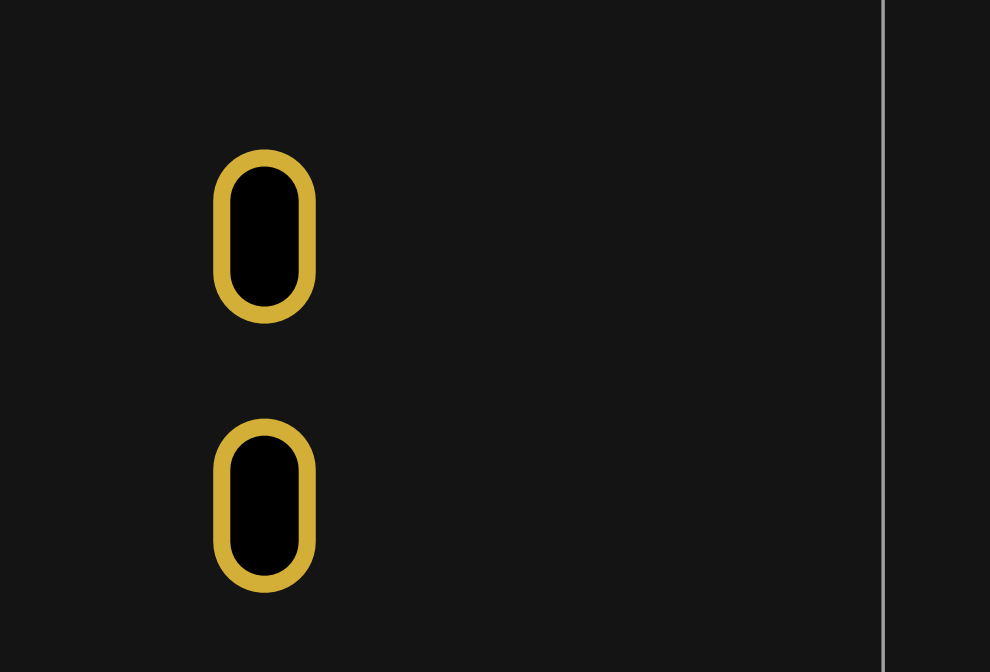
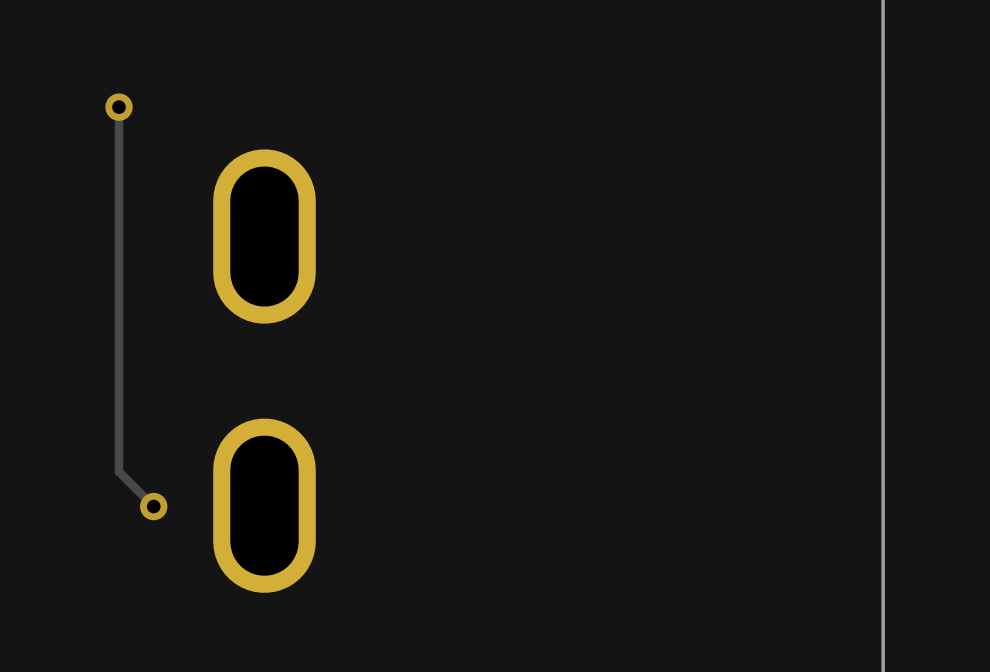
track: none -> (119, 107) (119, 471) (153, 506)
via: none -> (119, 107)
via: none -> (153, 506)

